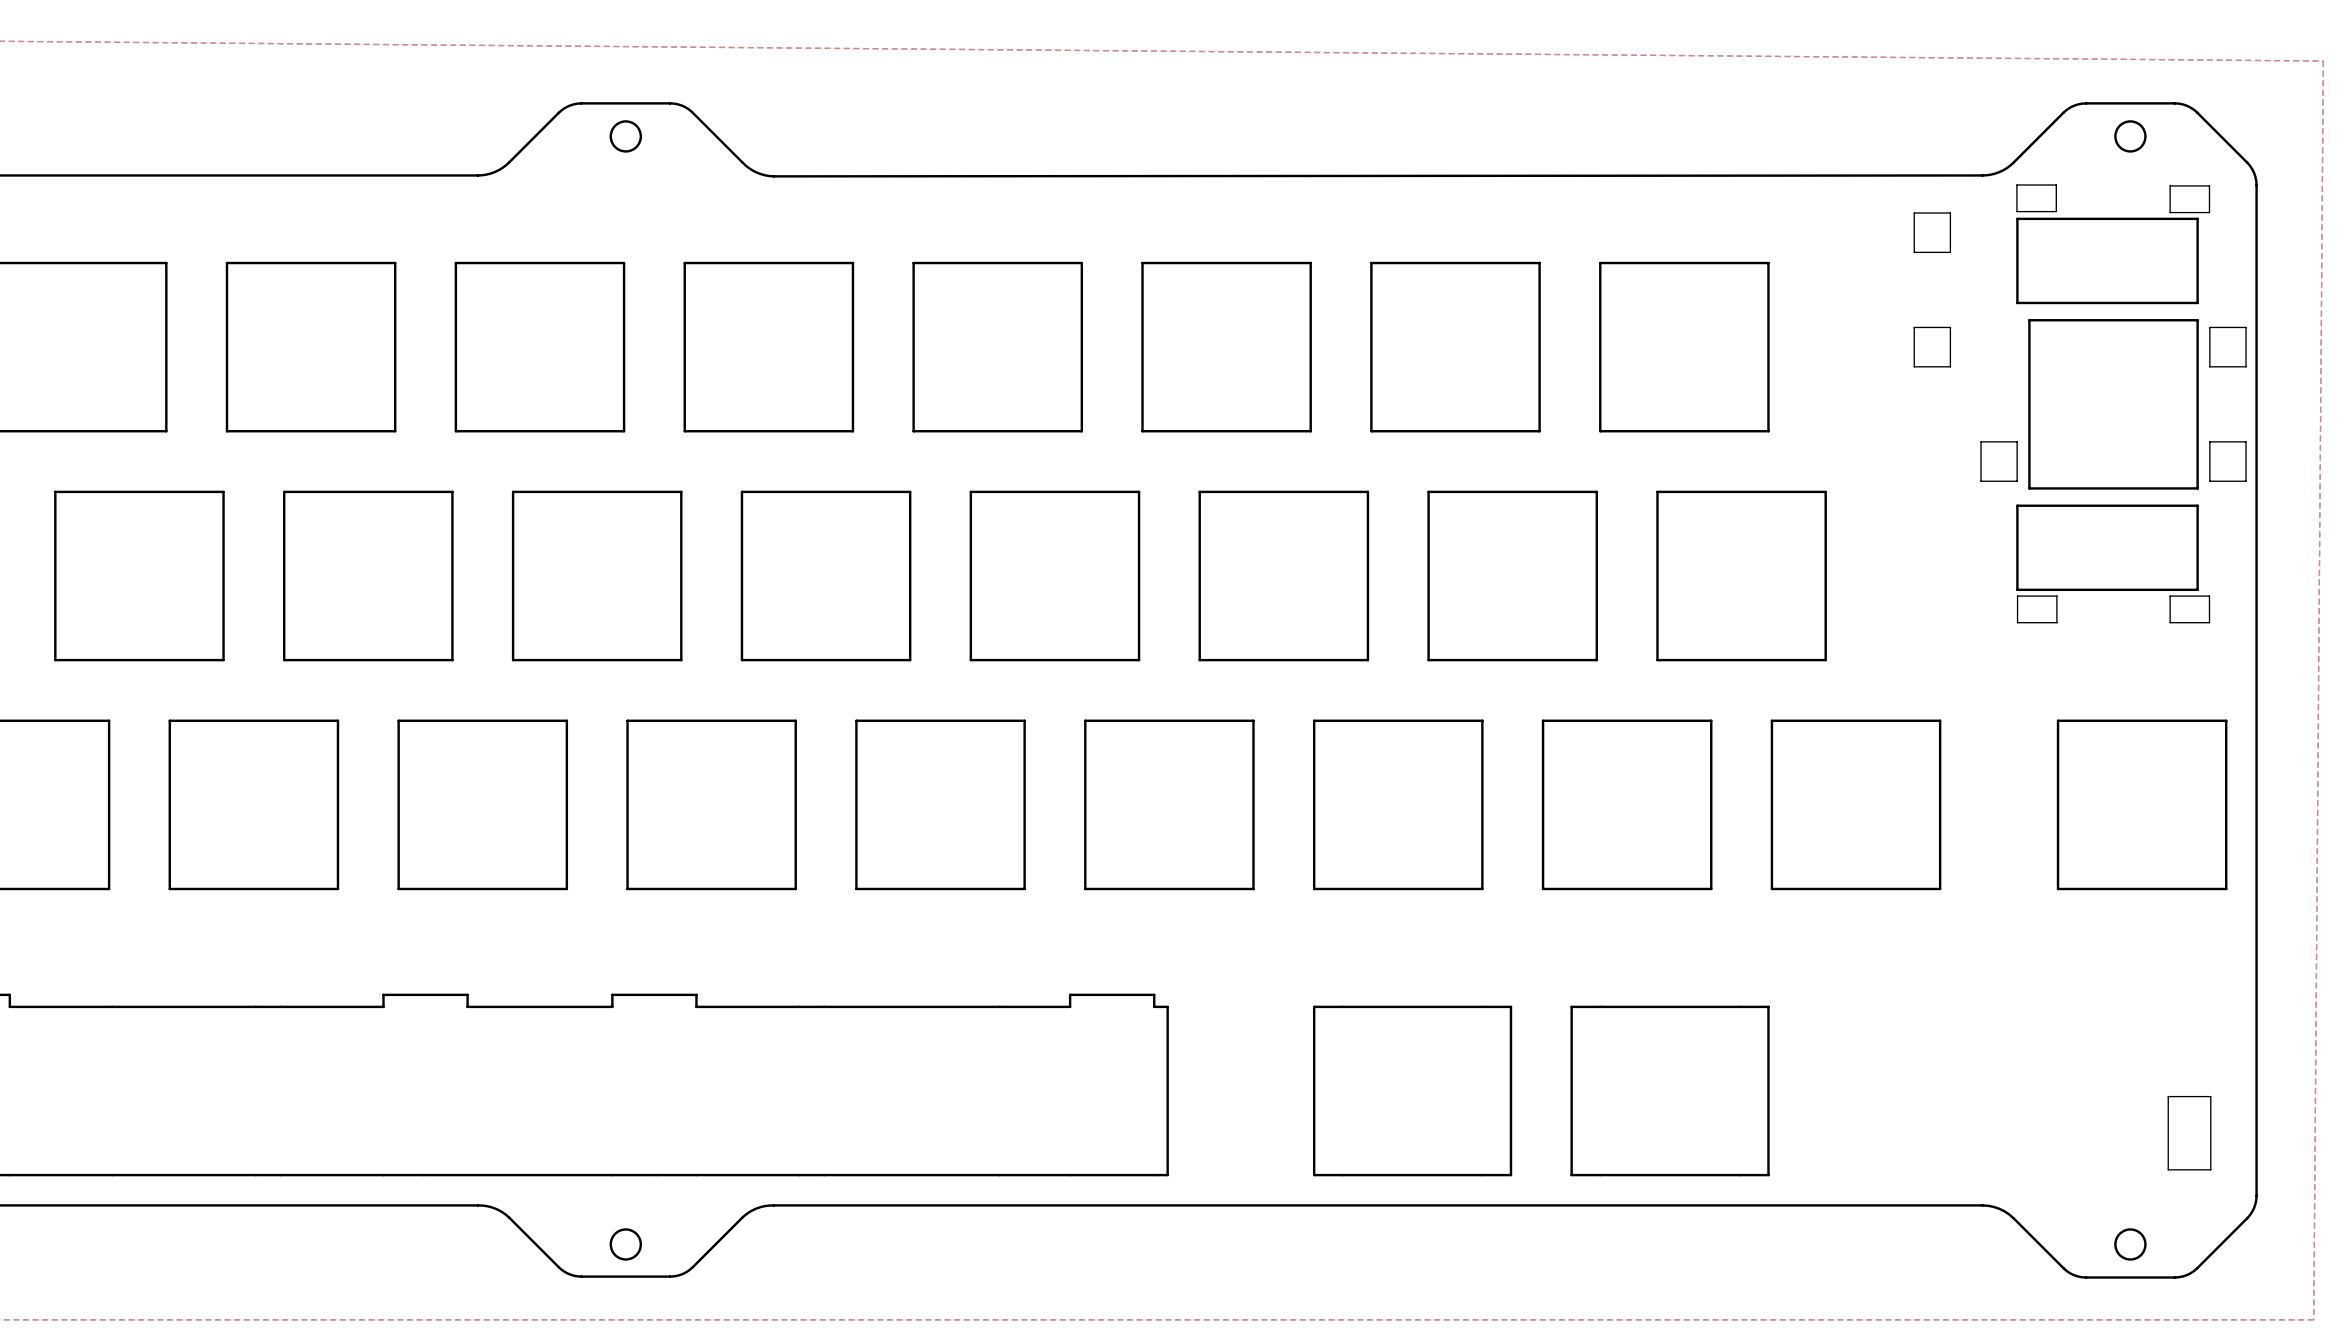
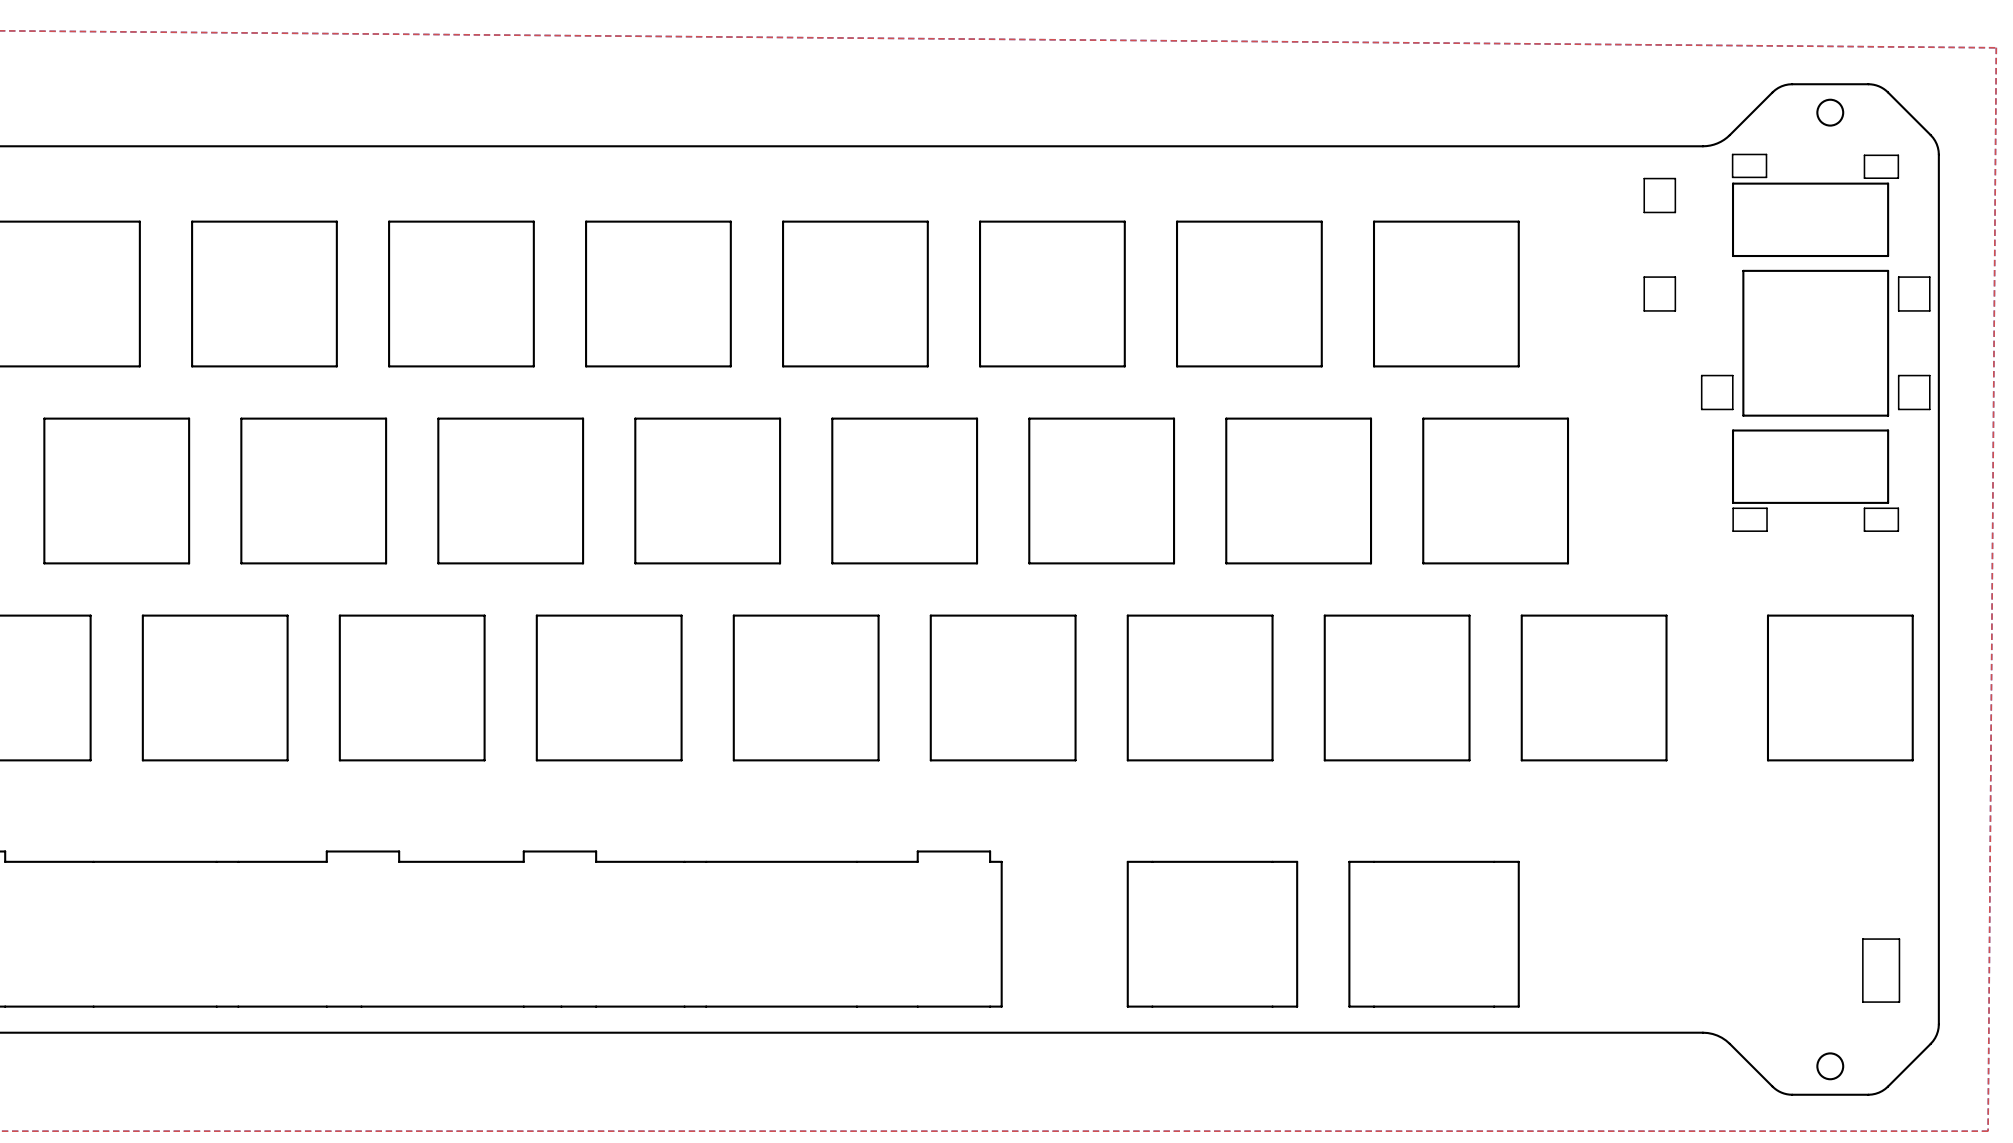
round board edge: [609, 120, 643, 153] -> none
board edge: (477, 175) (494, 172) (505, 165) (558, 112) (569, 105) (581, 103) (670, 103) (679, 104) (690, 110) (749, 168) (760, 174) (773, 176) (1982, 175) -> (407, 146) (1702, 146)
board edge: (477, 1205) (490, 1206) (502, 1212) (561, 1269) (569, 1274) (581, 1276) (670, 1276) (682, 1274) (692, 1267) (745, 1214) (761, 1206) (773, 1205) -> (407, 1032) (662, 1032)
round board edge: [609, 1228, 643, 1261] -> none

